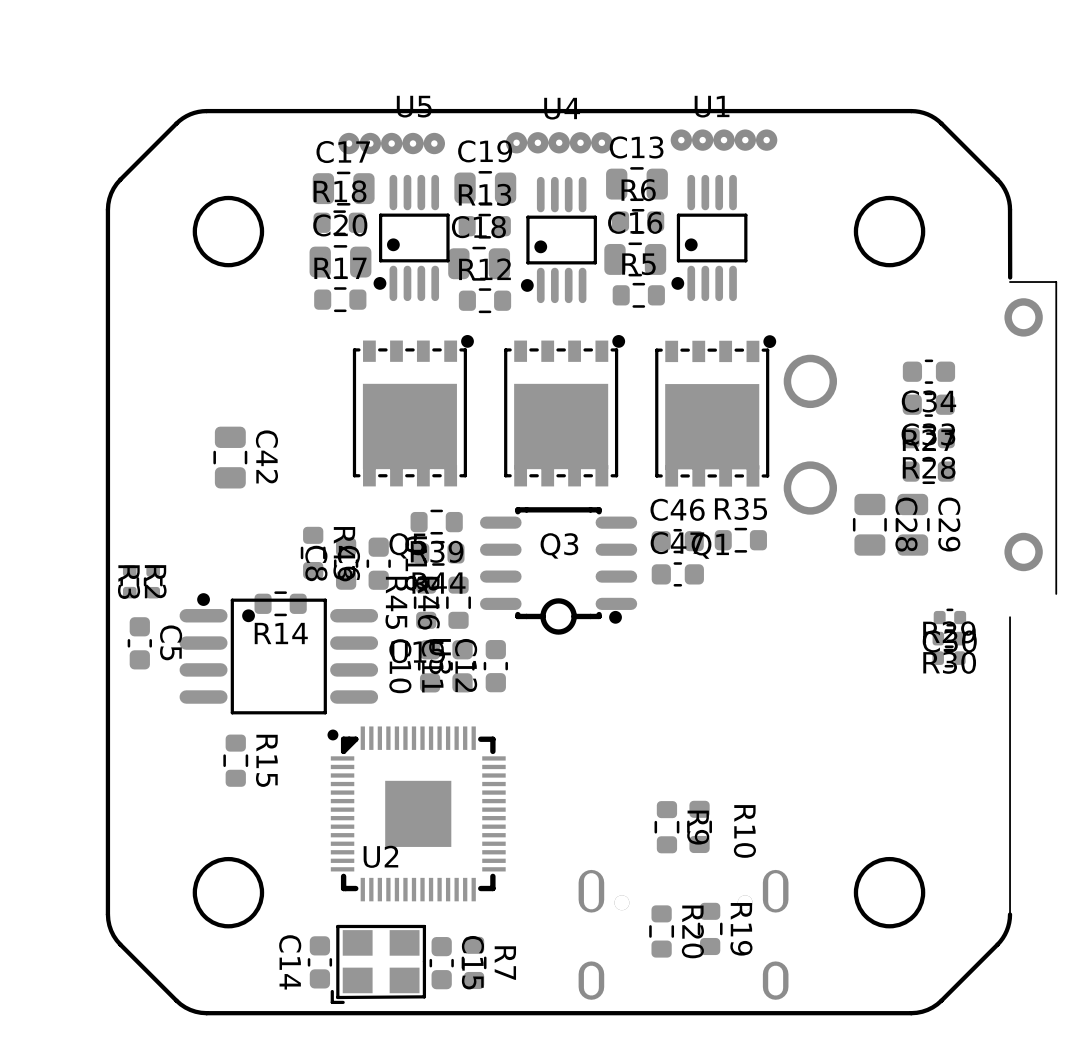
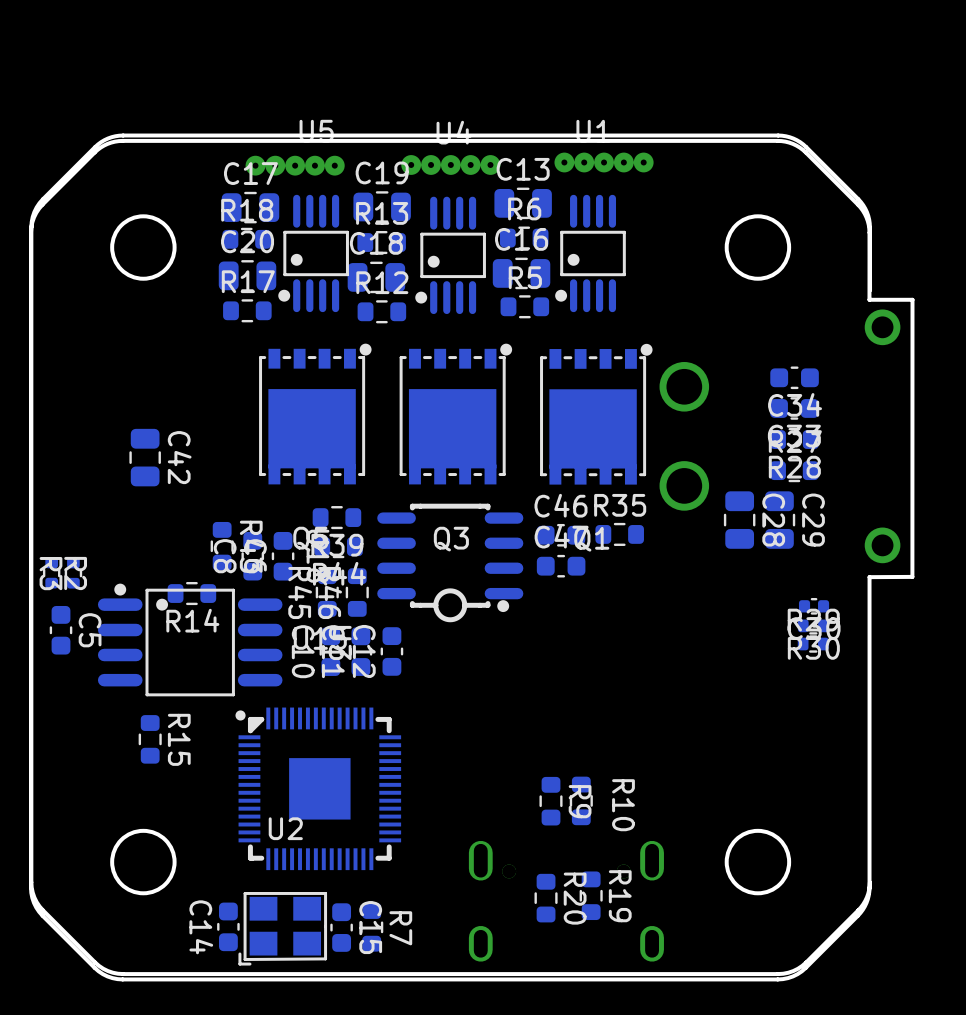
board edge: none -> (777, 140) (118, 141) (107, 143) (97, 149) (39, 208) (33, 217) (30, 232) (31, 892) (39, 911) (98, 971) (112, 978) (122, 979) (782, 979) (801, 971) (860, 912) (866, 902) (869, 887) (869, 577) (912, 576) (912, 299) (869, 299) (869, 228) (864, 213) (857, 204) (802, 149) (789, 142) (777, 140)
board edge: (1009, 282) (1056, 282) (1056, 593) -> none

